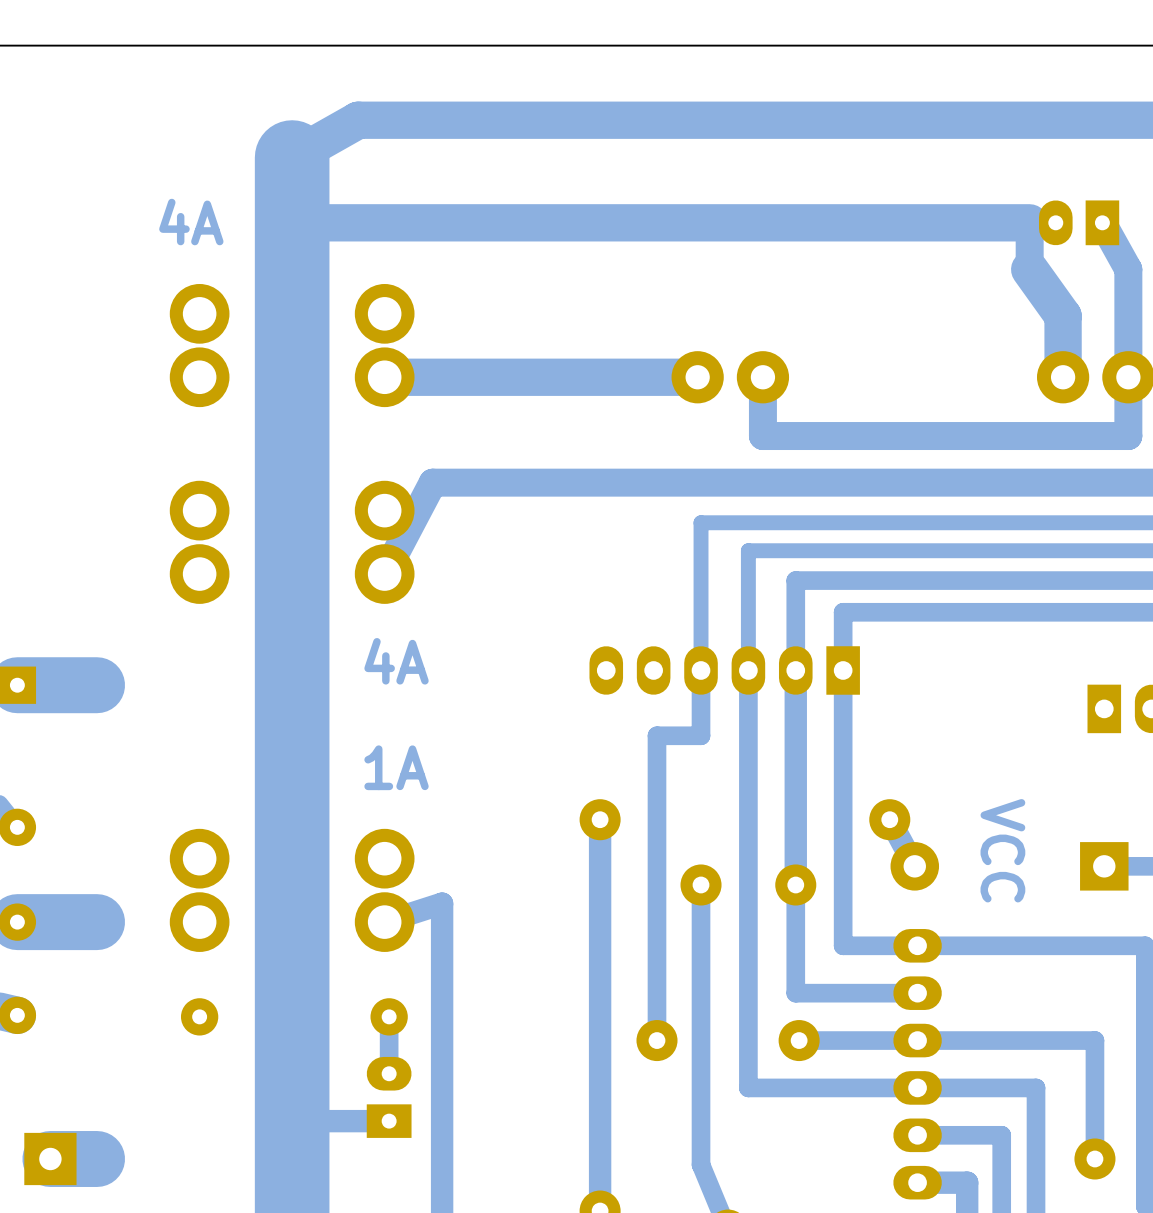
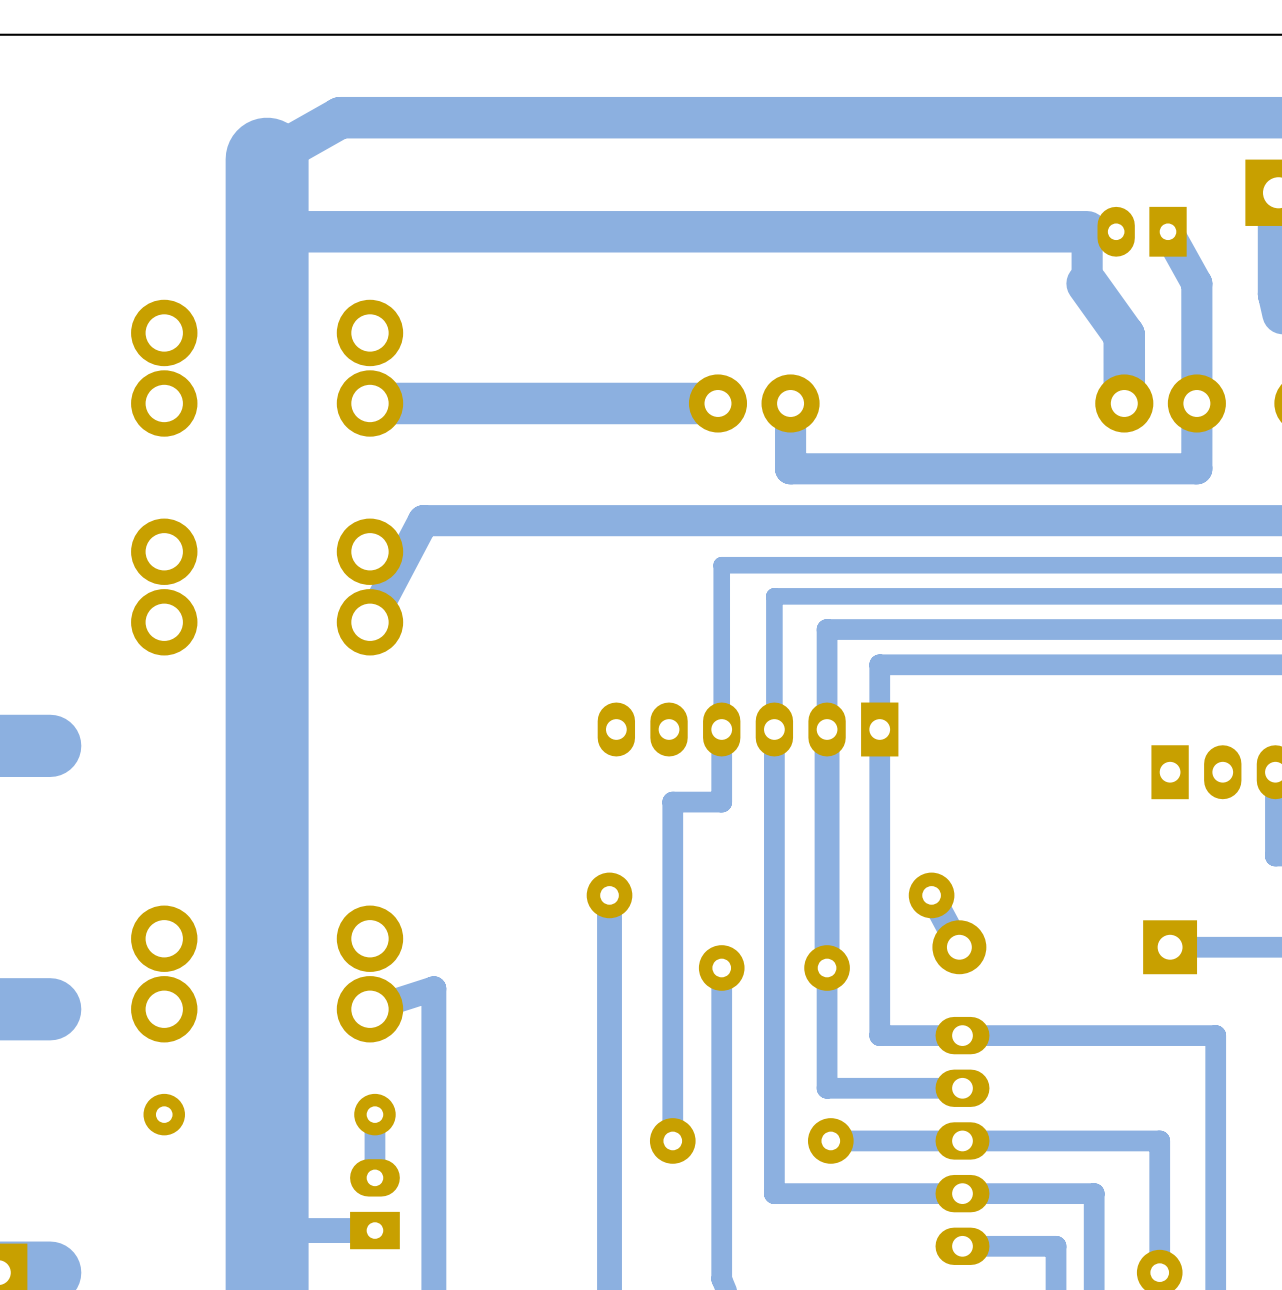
text: 4A (191, 222) -> none
text: 4A (396, 661) -> none
text: 1A (396, 767) -> none
text: VCC (1002, 850) -> none

